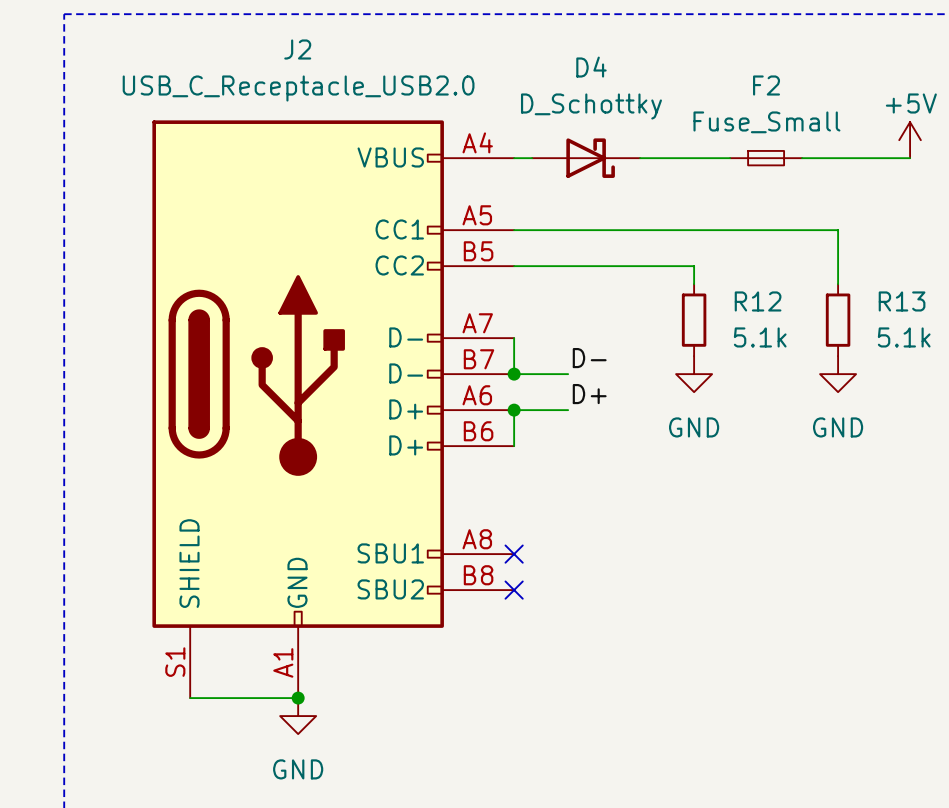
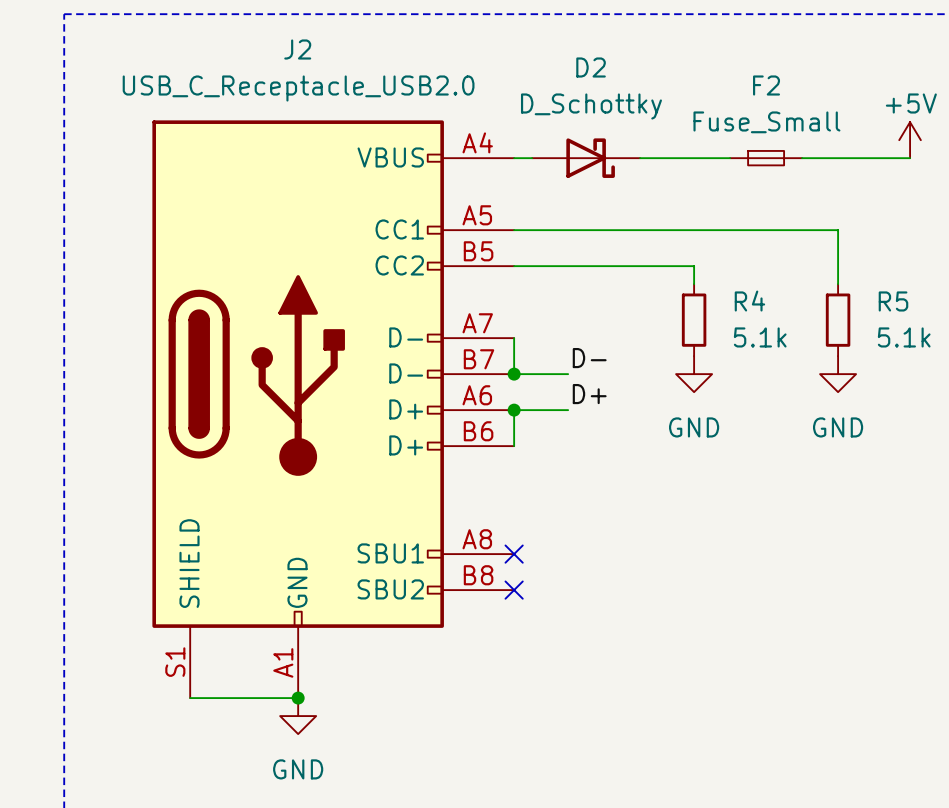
D4 name: D4 (591, 67) -> D2 (591, 67)
R12 name: R12 (758, 301) -> R4 (749, 301)
R13 name: R13 (902, 301) -> R5 (893, 301)

